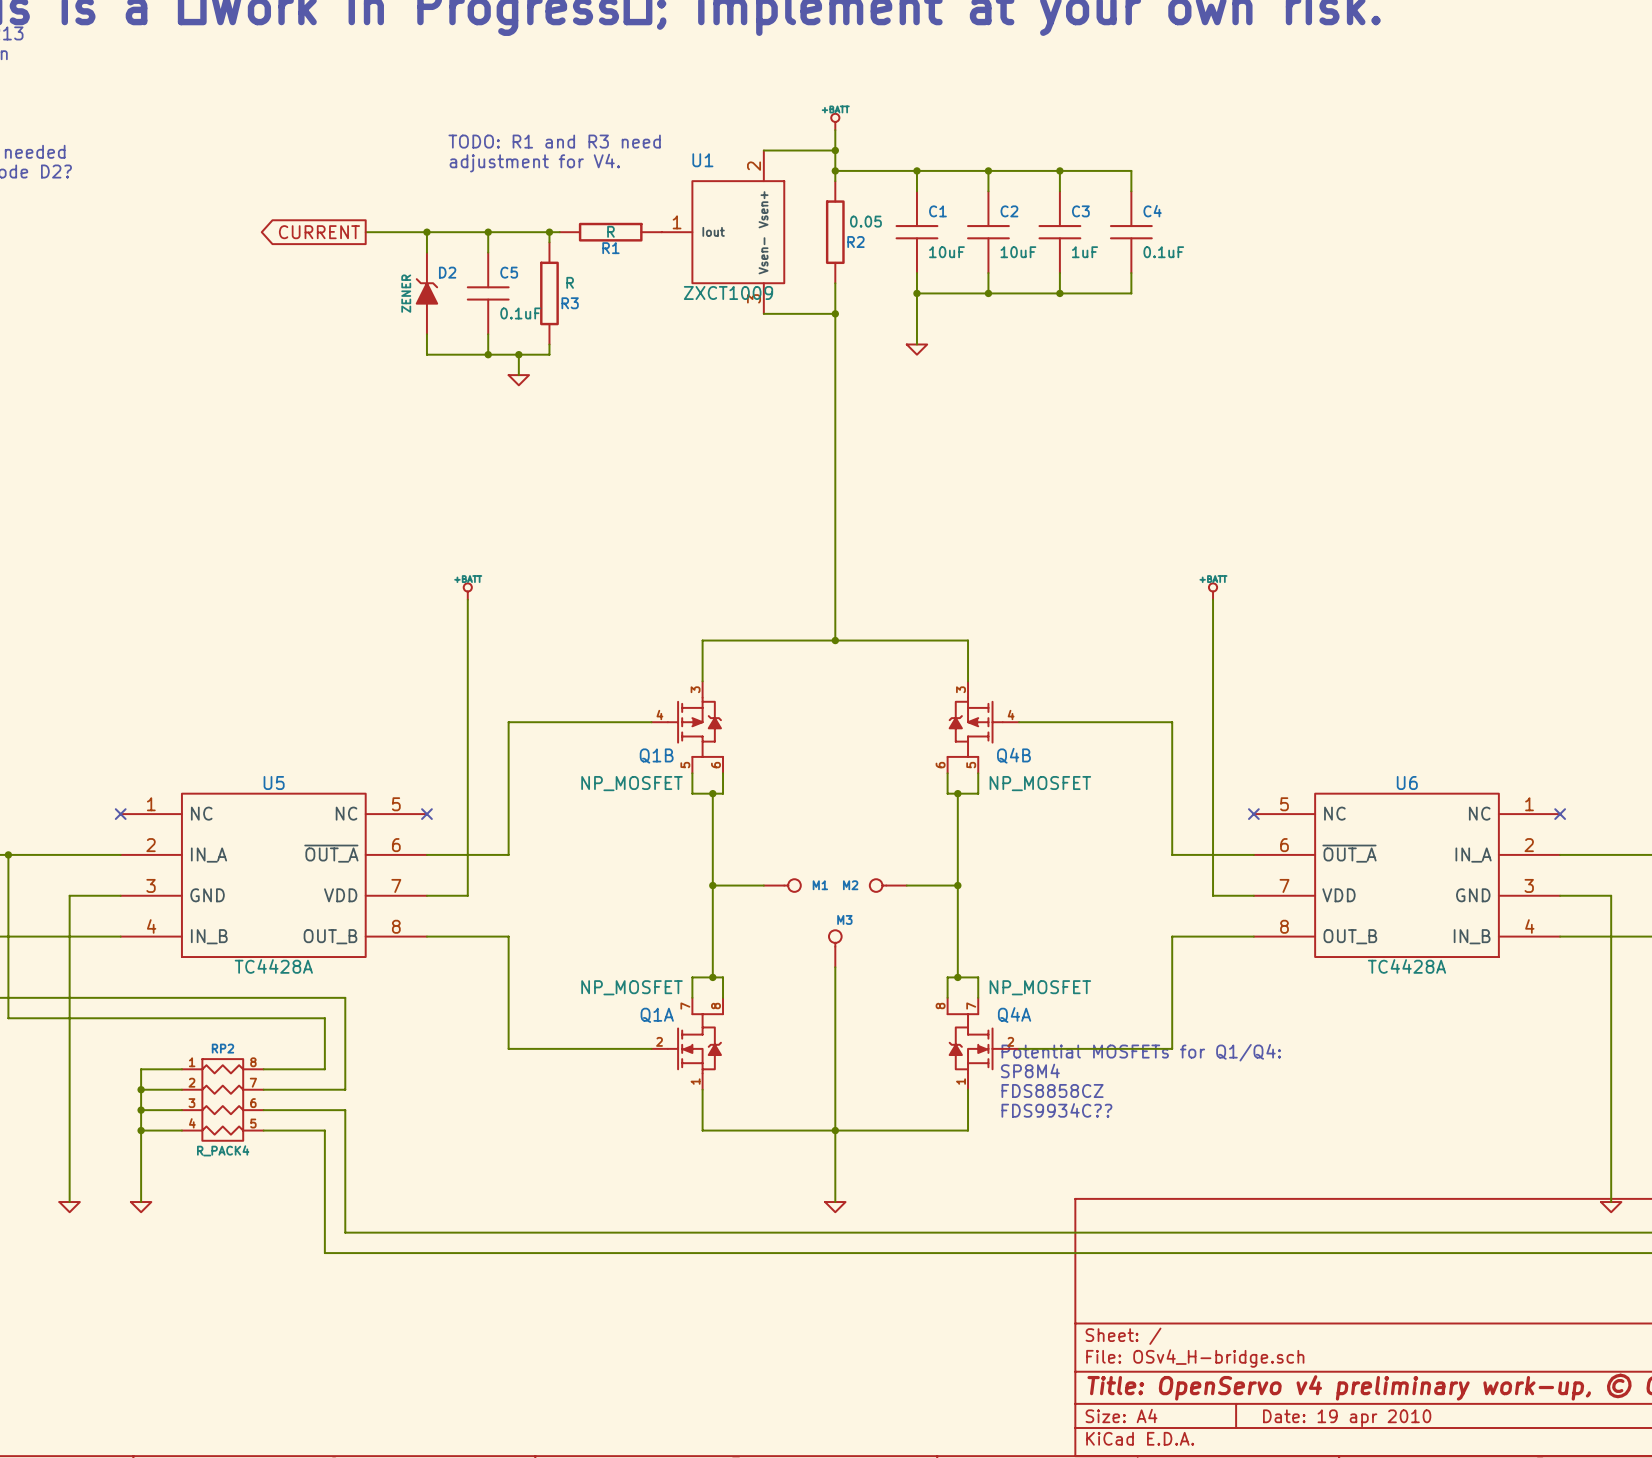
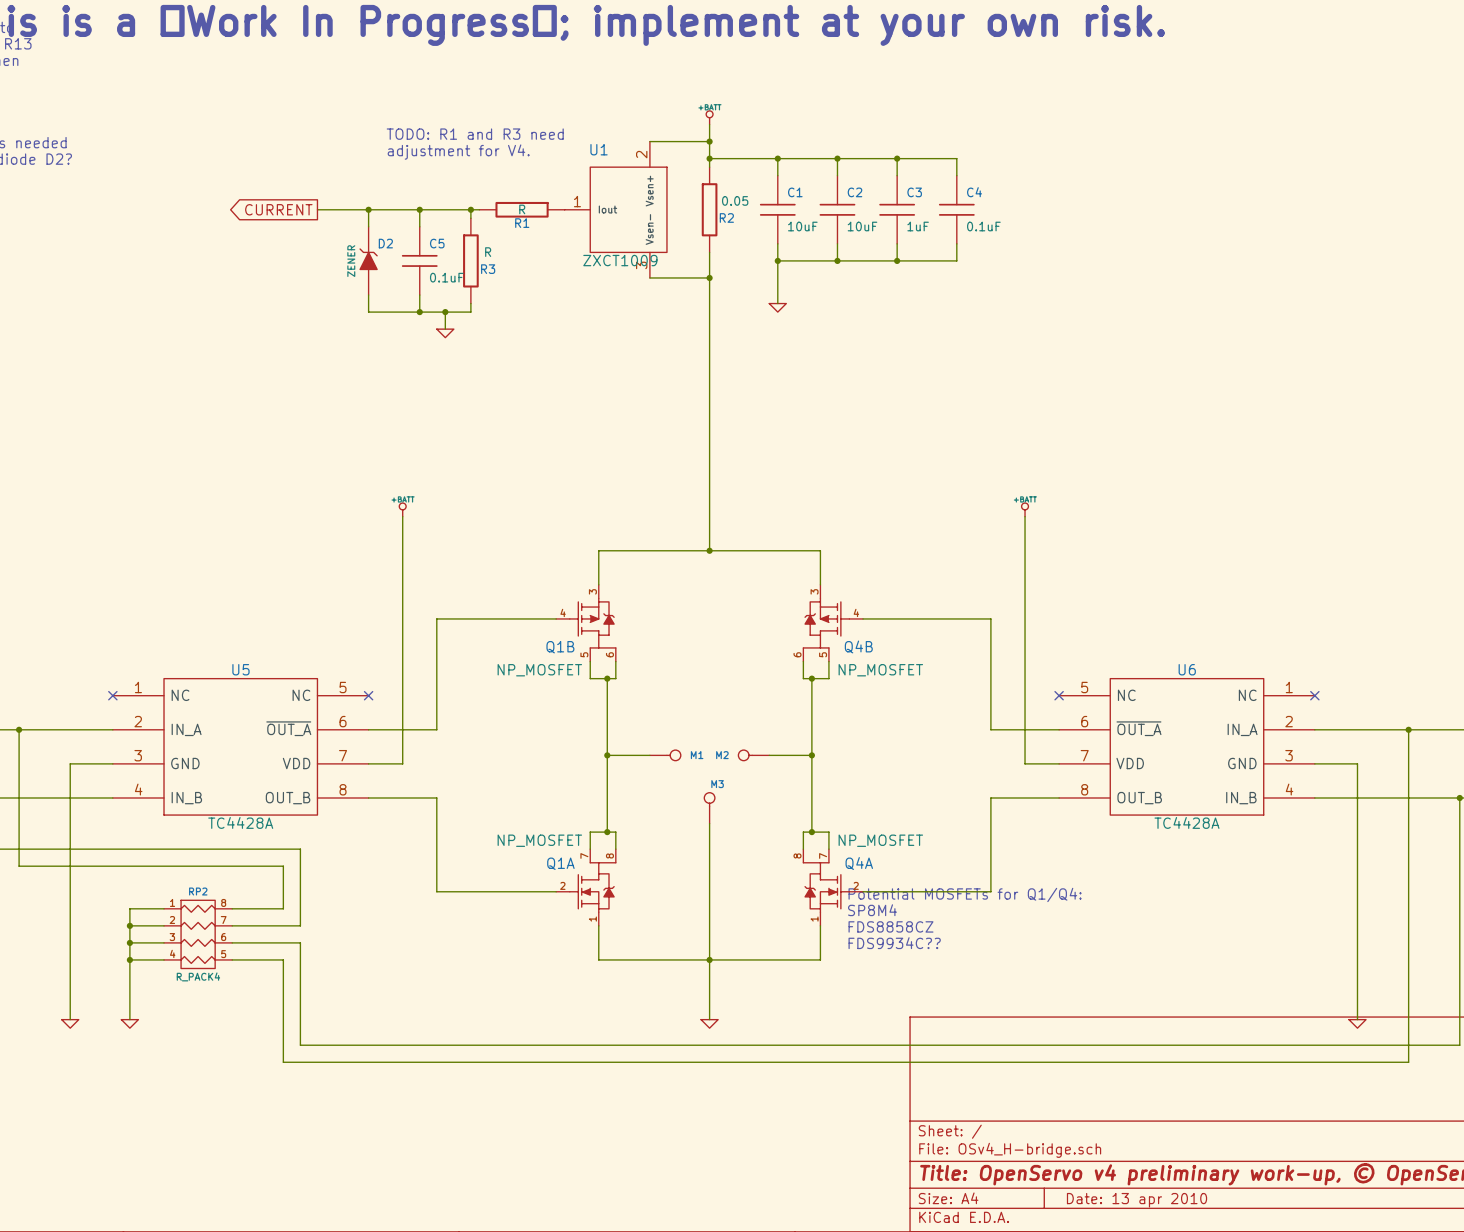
title block: Date: 19 apr 2010 (1347, 1418) -> Date: 13 apr 2010 (1137, 1200)

